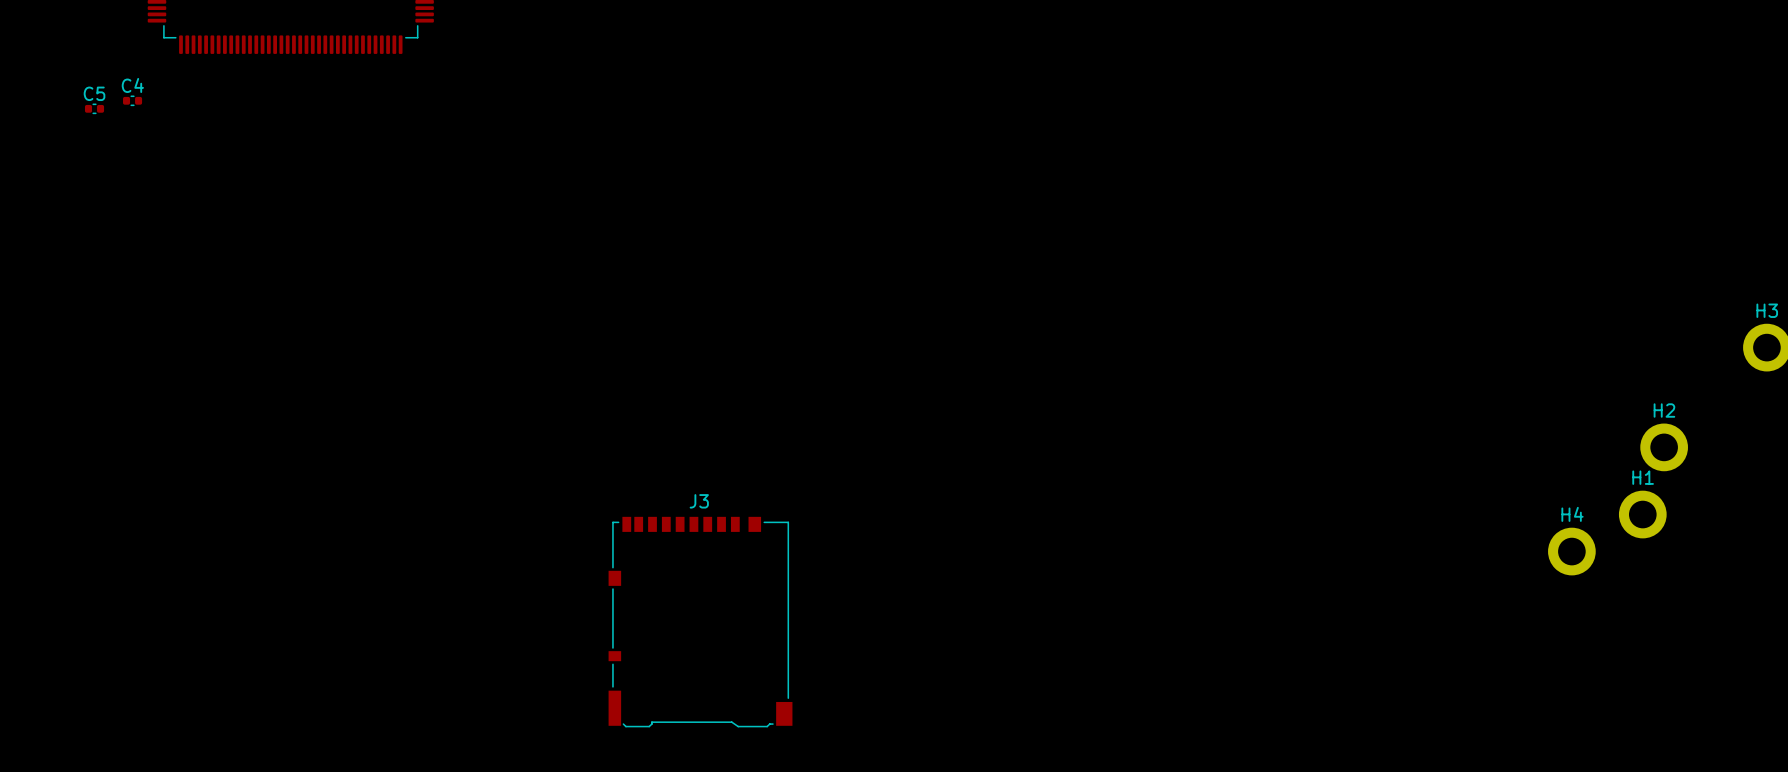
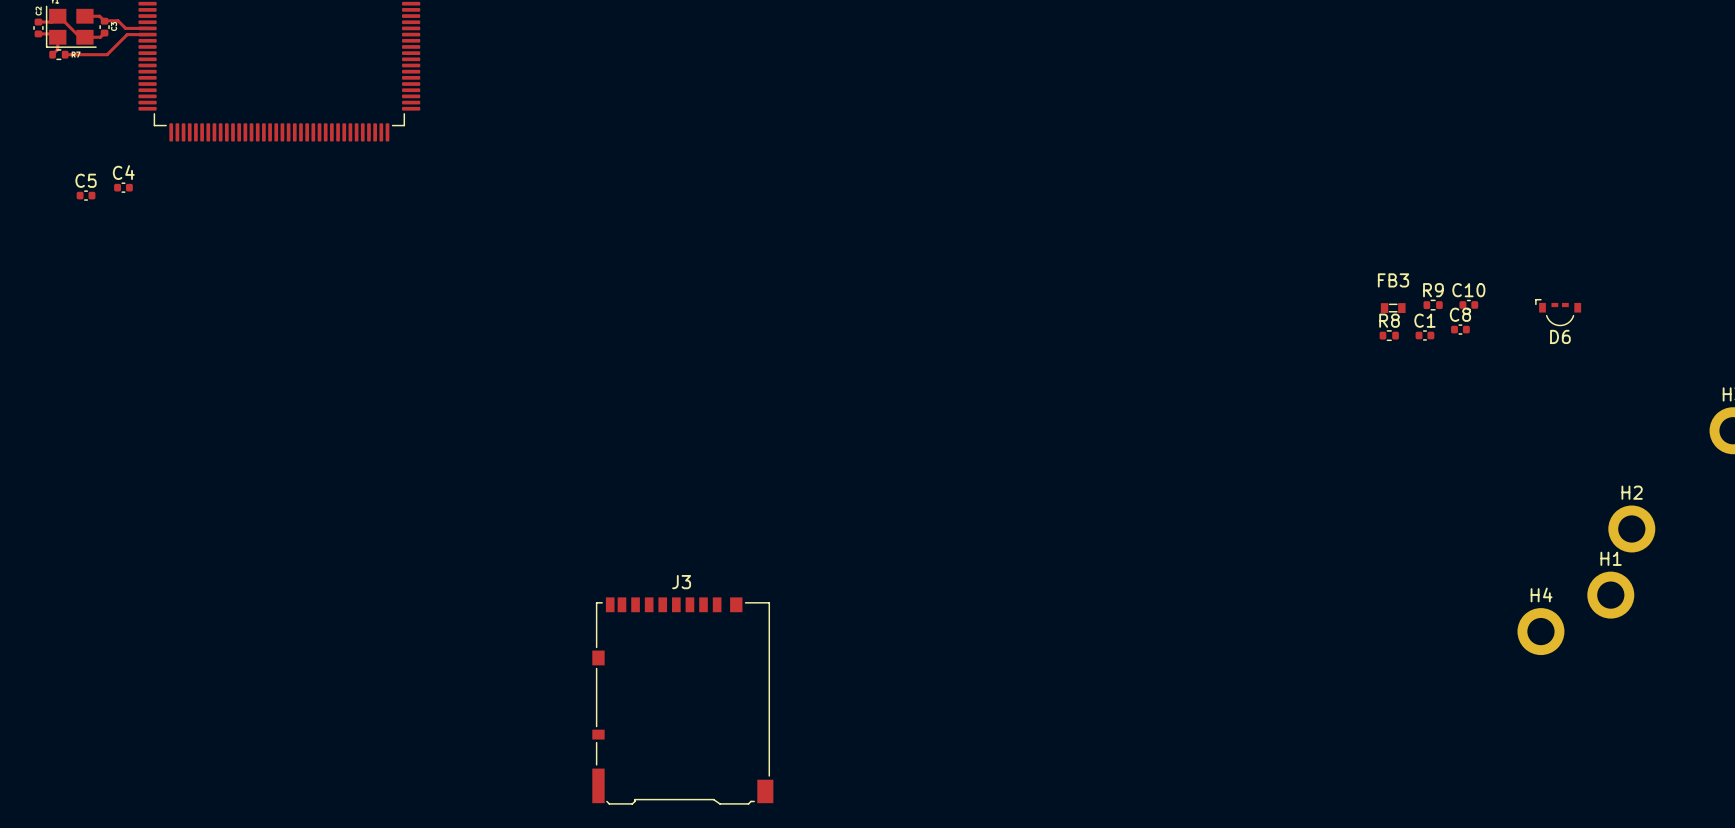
C10: none -> (1468, 304)
R9: none -> (1433, 305)
FB3: none -> (1393, 308)
D6: none -> (1558, 312)
C8: none -> (1460, 329)
C1: none -> (1424, 335)
R8: none -> (1389, 335)

